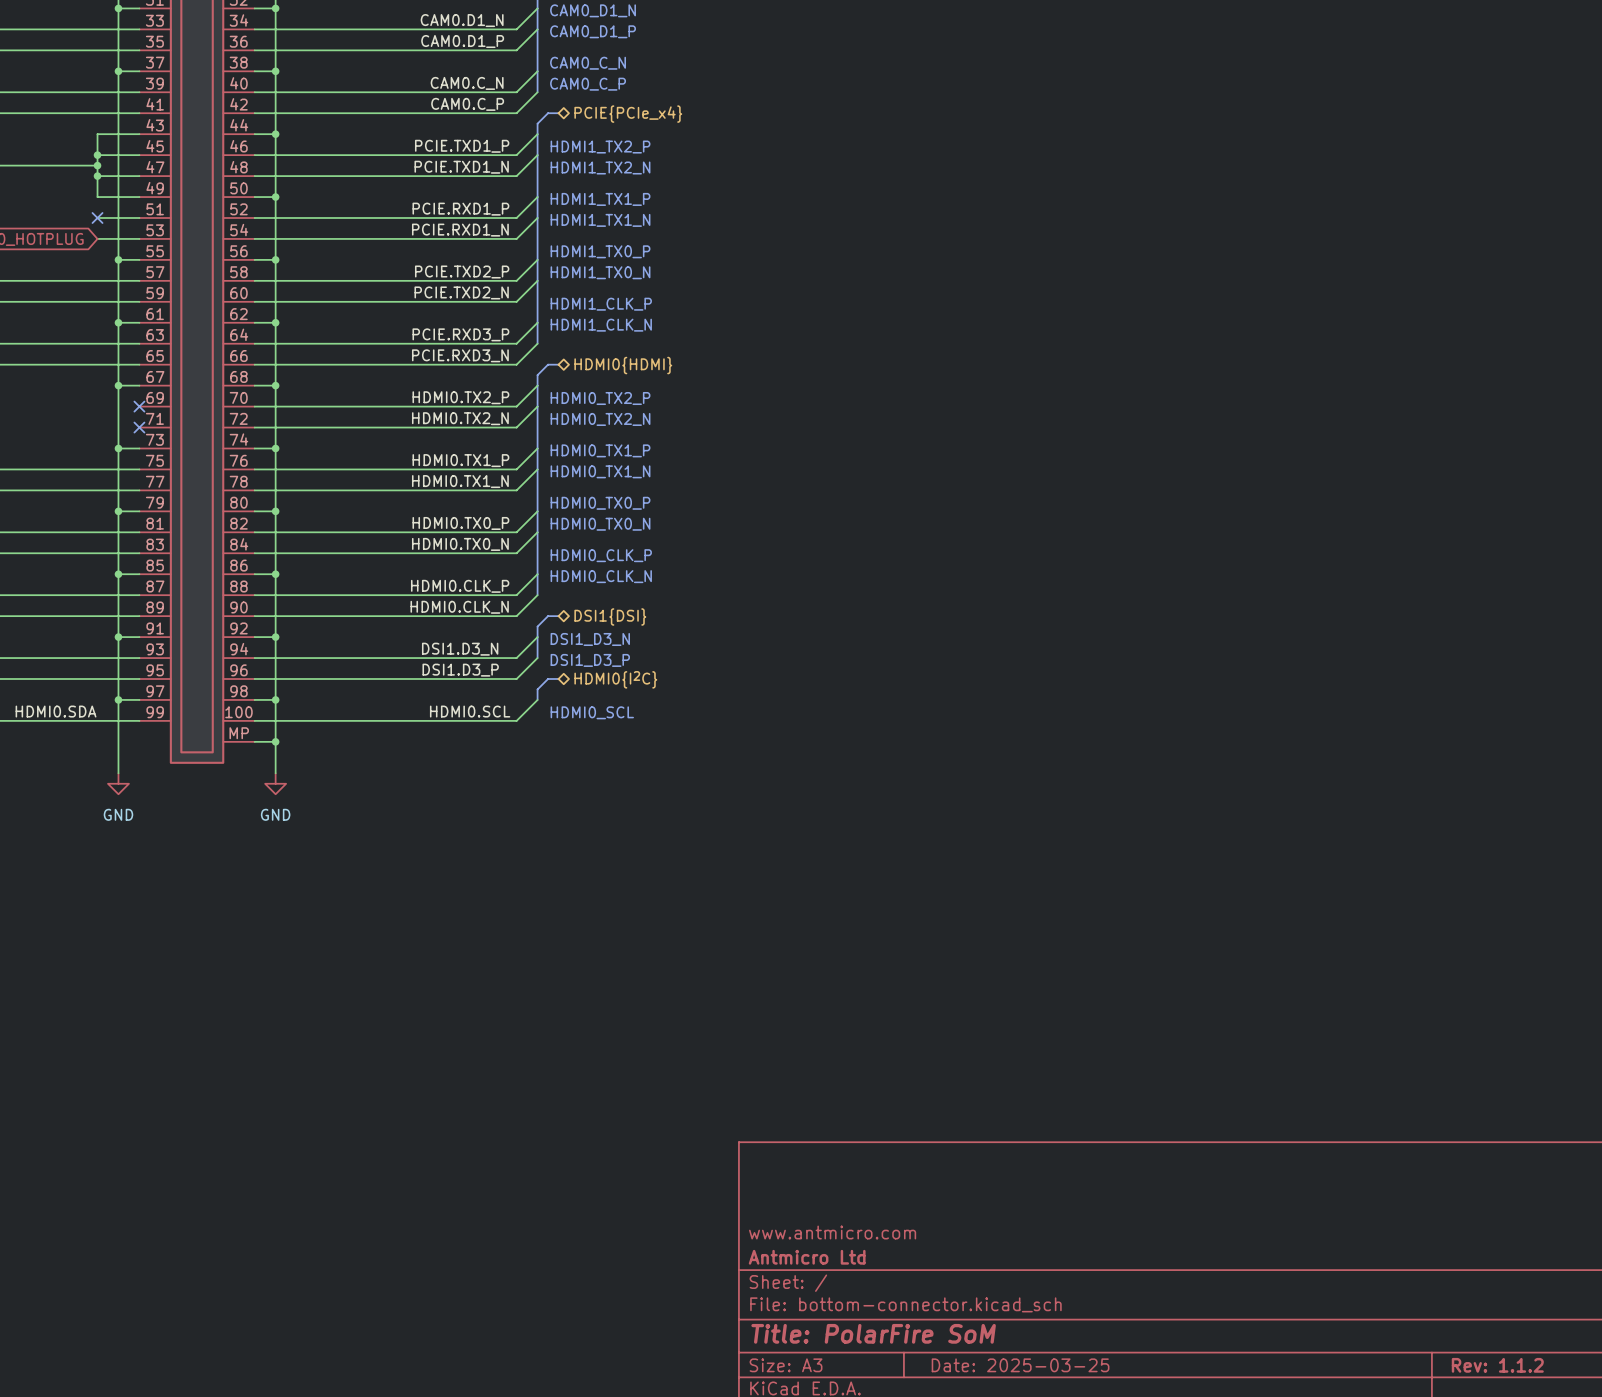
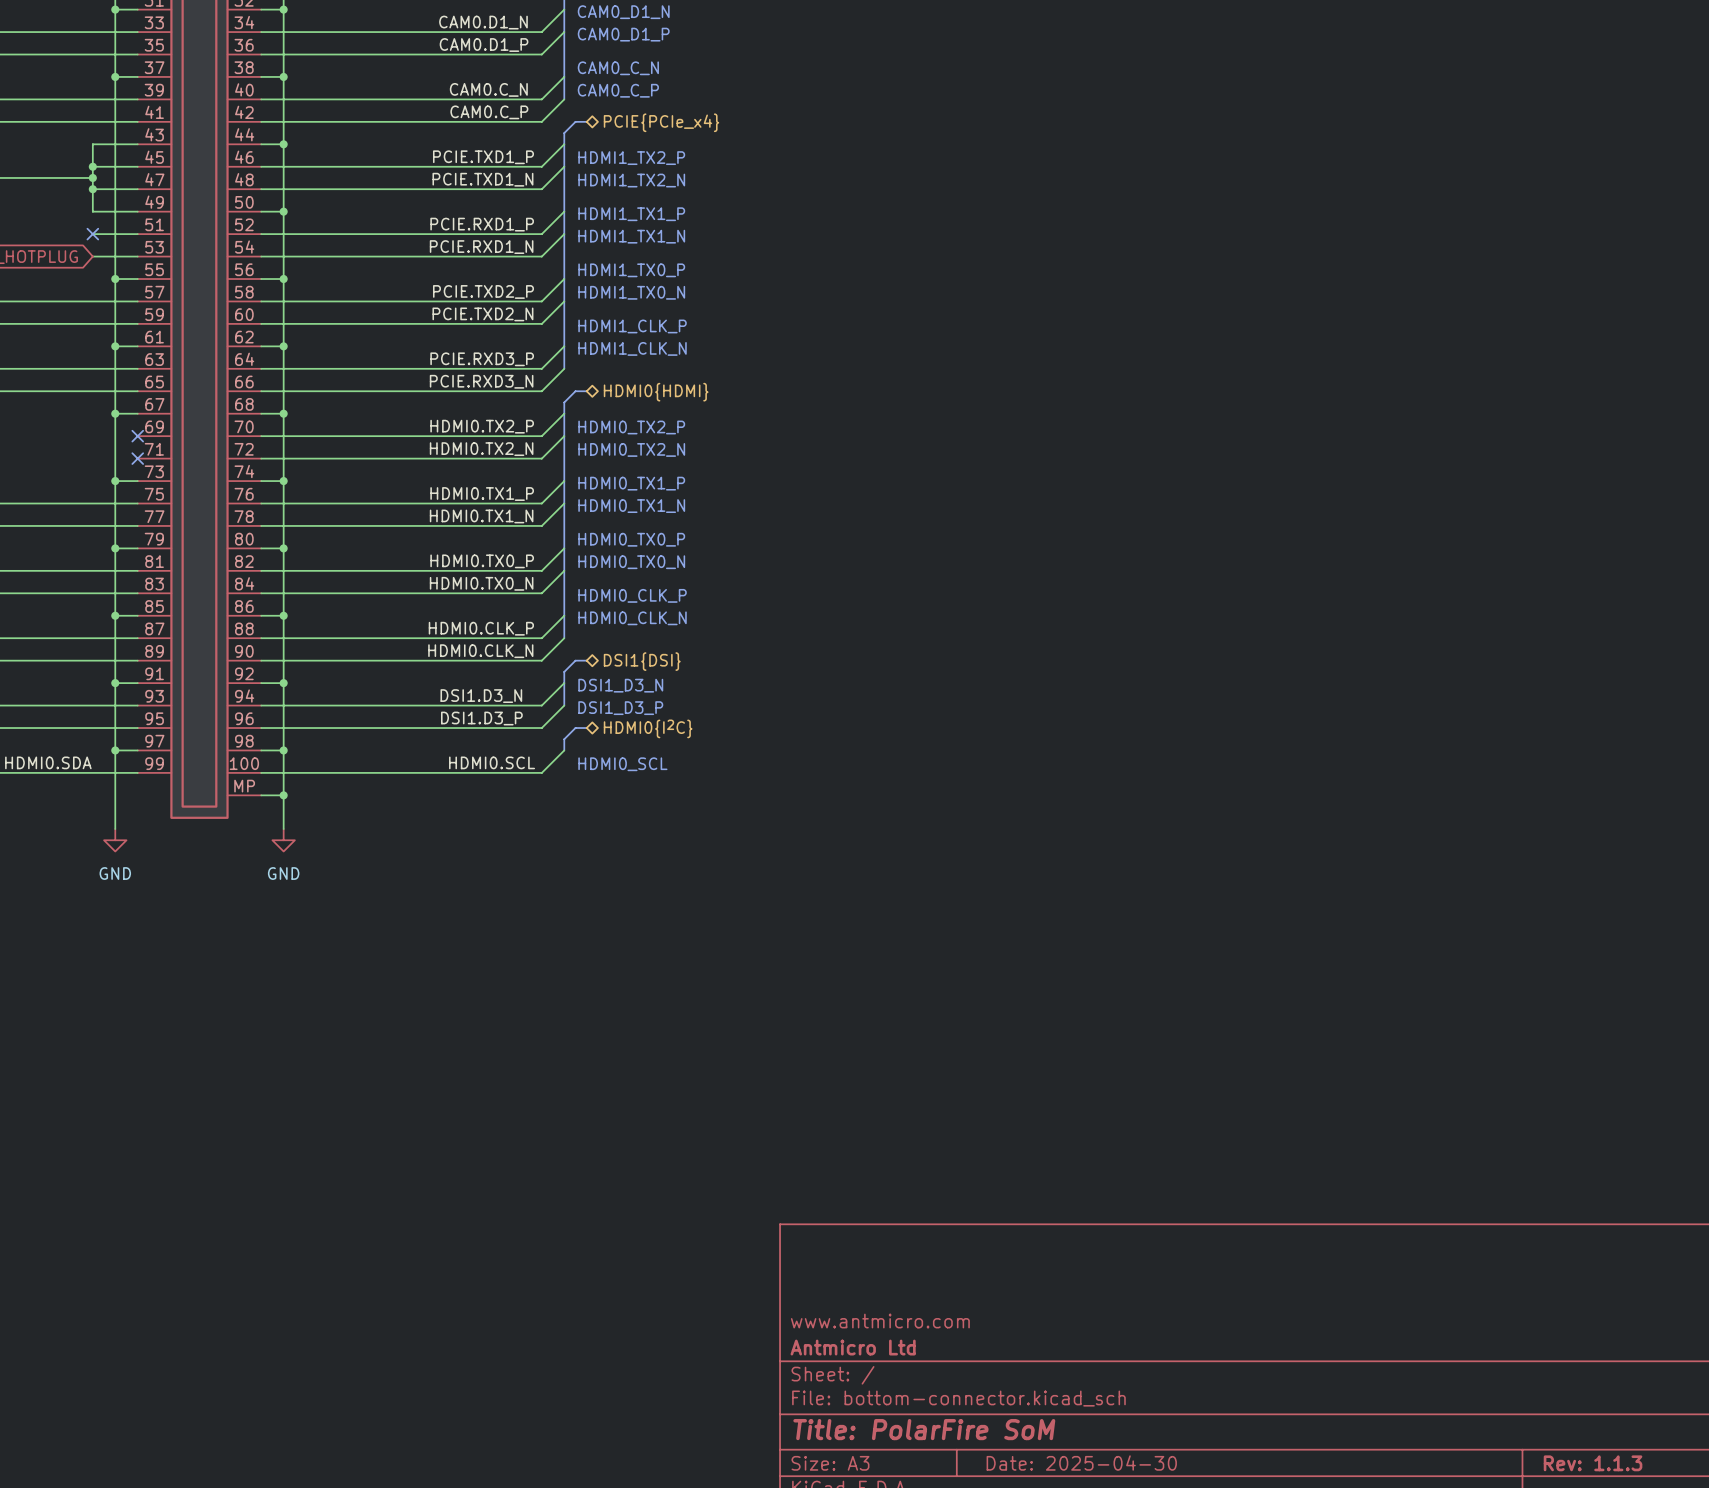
title block: Date: 2025-03-25 (1020, 1365) -> Date: 2025-04-30 (1081, 1463)
title block: Rev: 1.1.2 (1497, 1365) -> Rev: 1.1.3 (1593, 1463)

